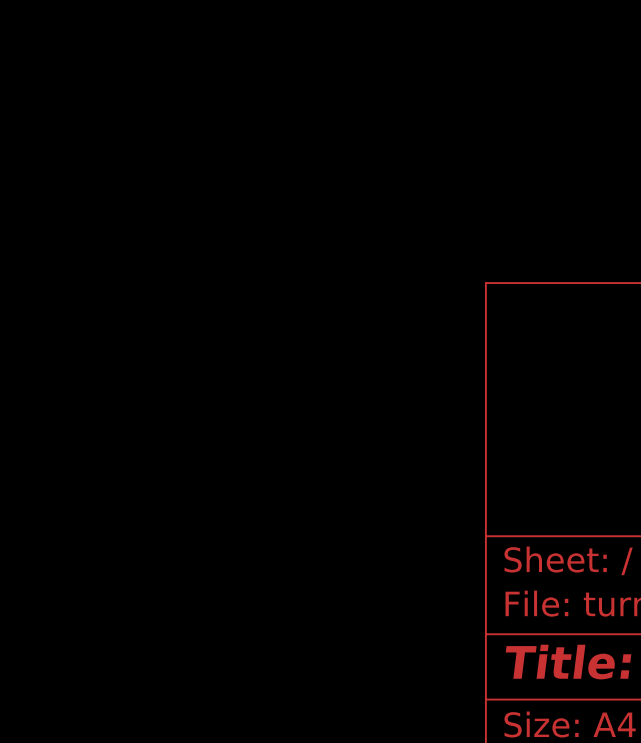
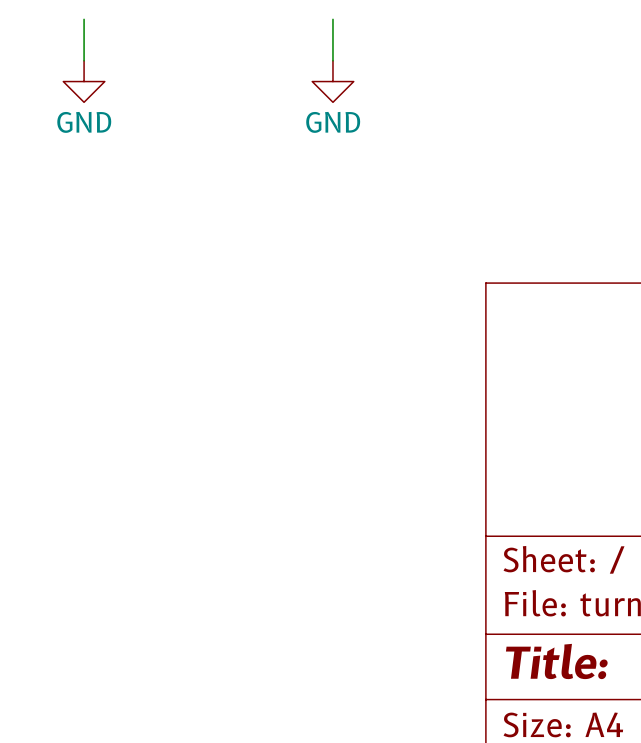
wire: none -> (84, 19) (84, 60)
wire: none -> (332, 19) (332, 60)
power symbol: none -> GND (84, 81)
power symbol: none -> GND (332, 81)

